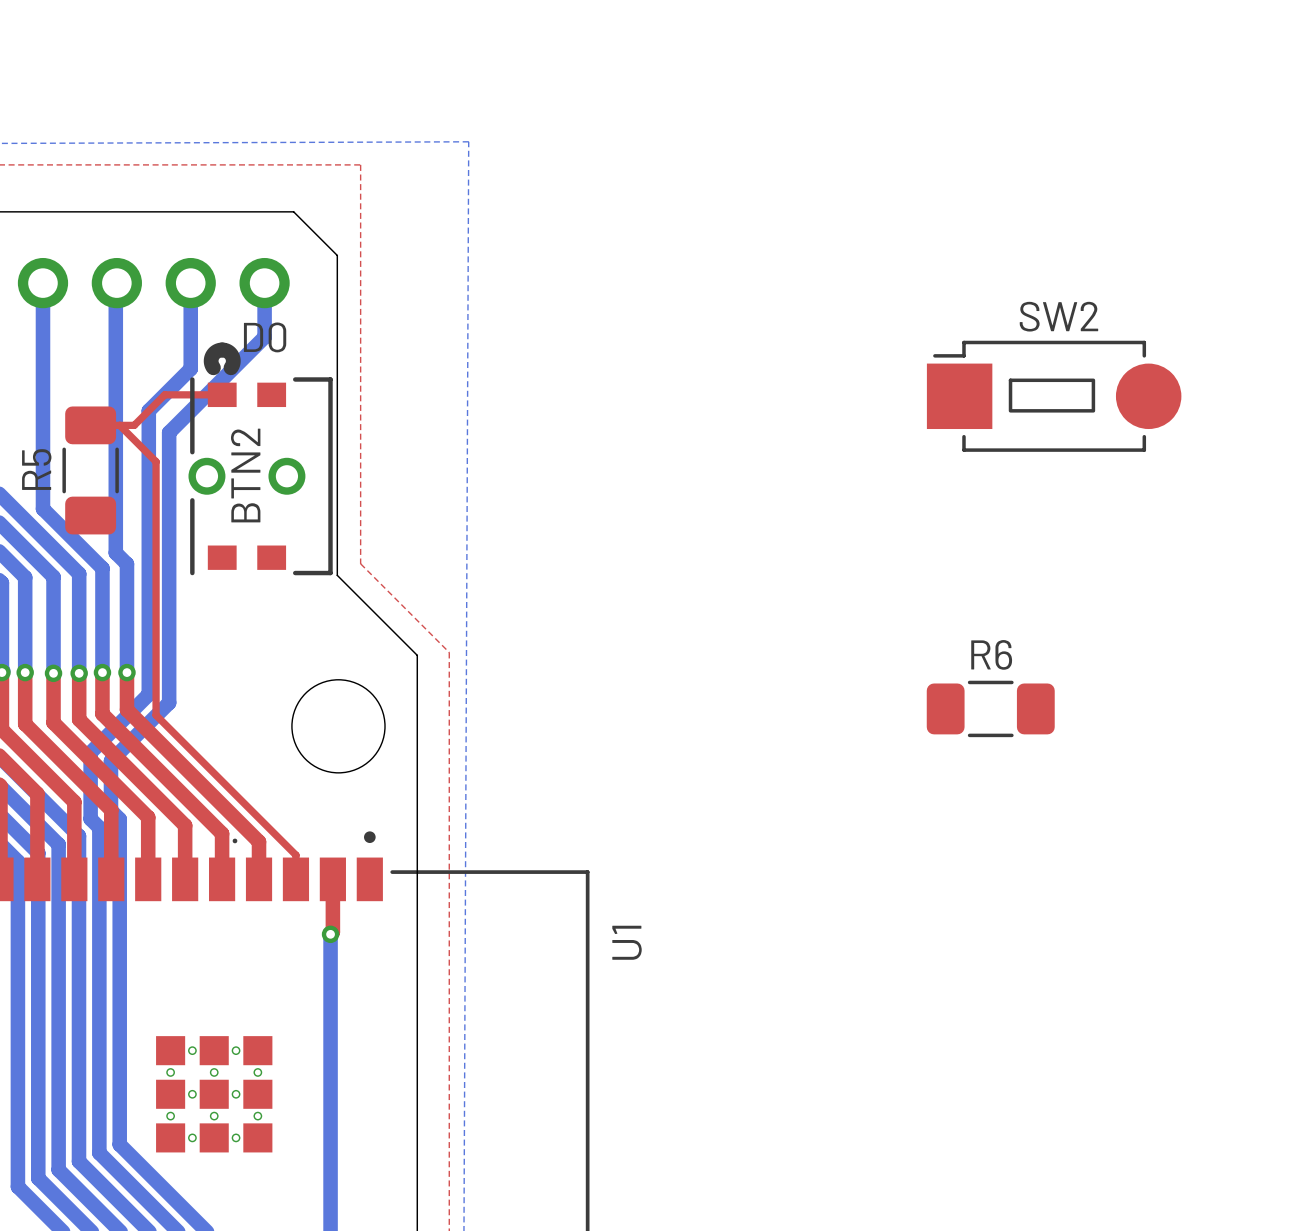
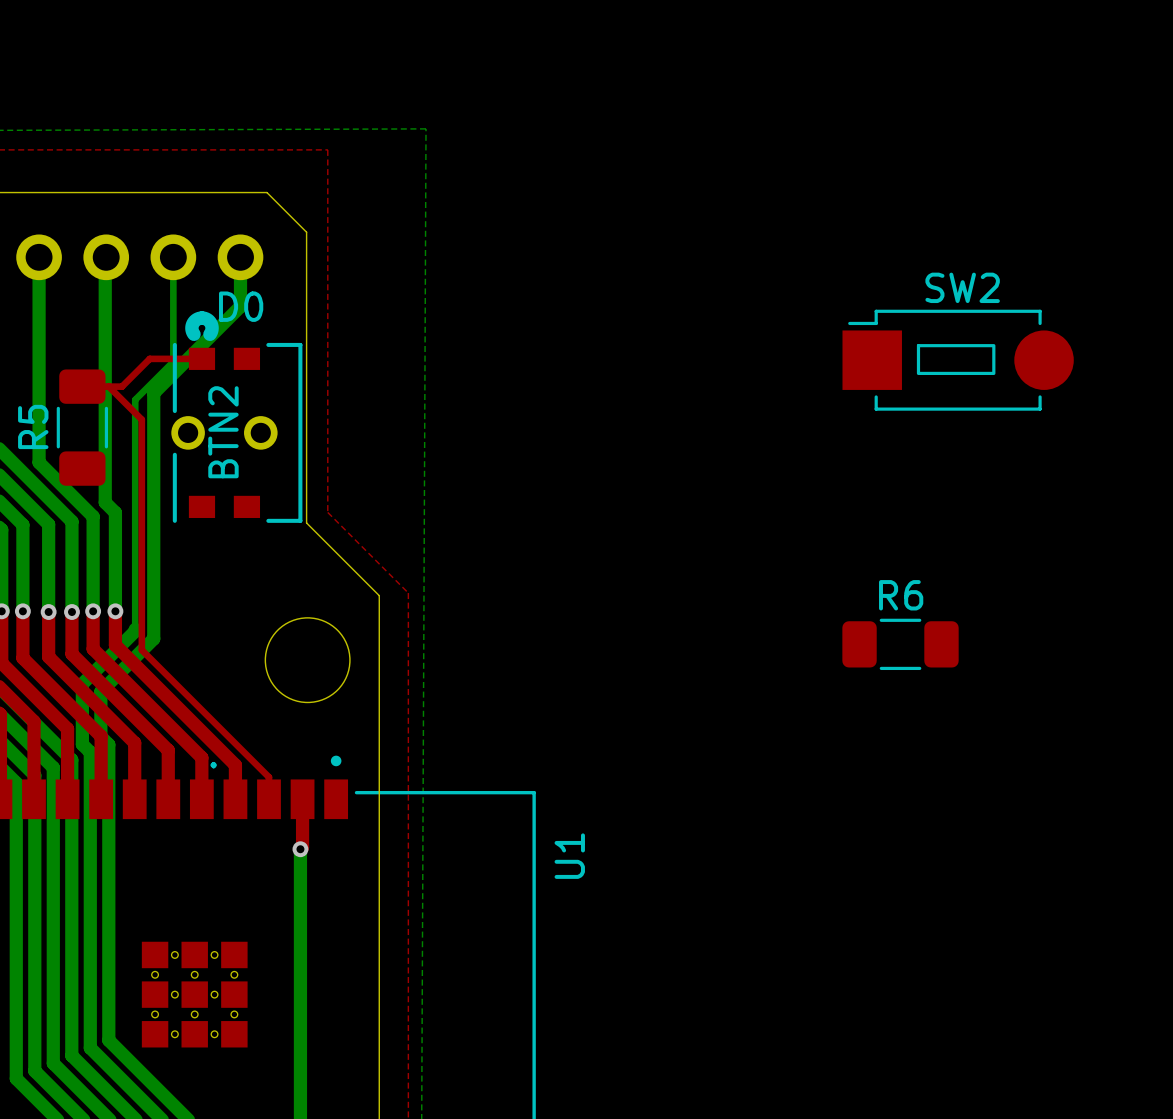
bottom track width: thick (190, 283) (190, 368) -> thin (173, 257) (173, 335)
bottom track: (190, 368) (148, 410) (148, 439) -> (173, 335) (173, 361) (135, 399)
bottom track width: thick (148, 439) (148, 692) -> thin (135, 399) (135, 629)

